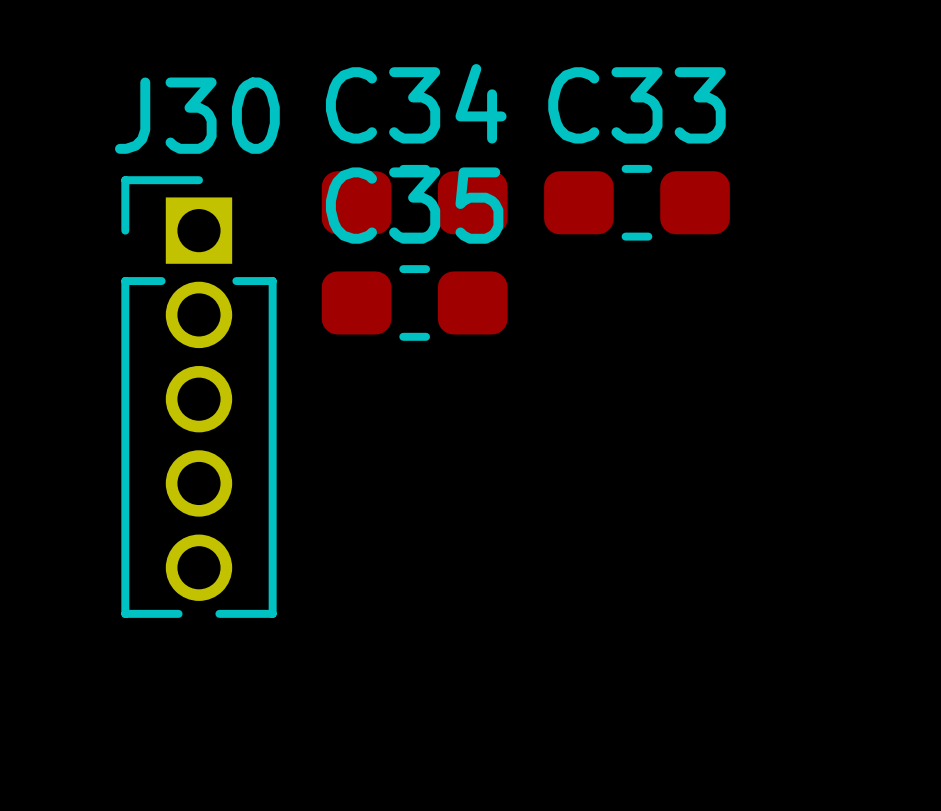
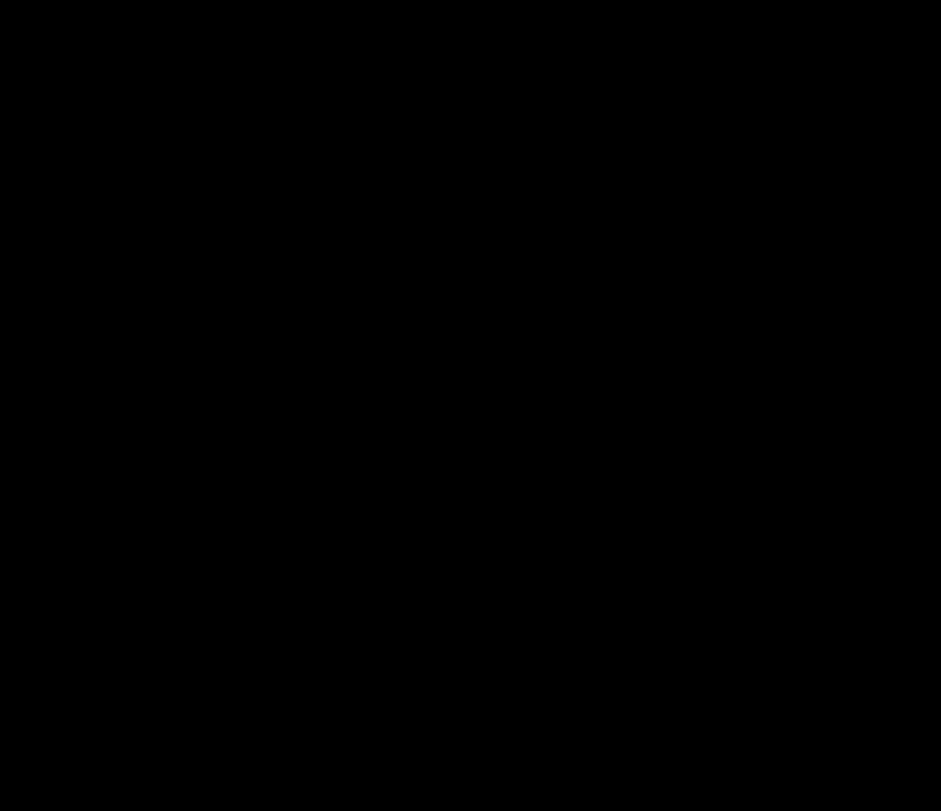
C34: (414, 202) -> none
C33: (636, 202) -> none
C35: (414, 302) -> none
J30: (198, 397) -> none

